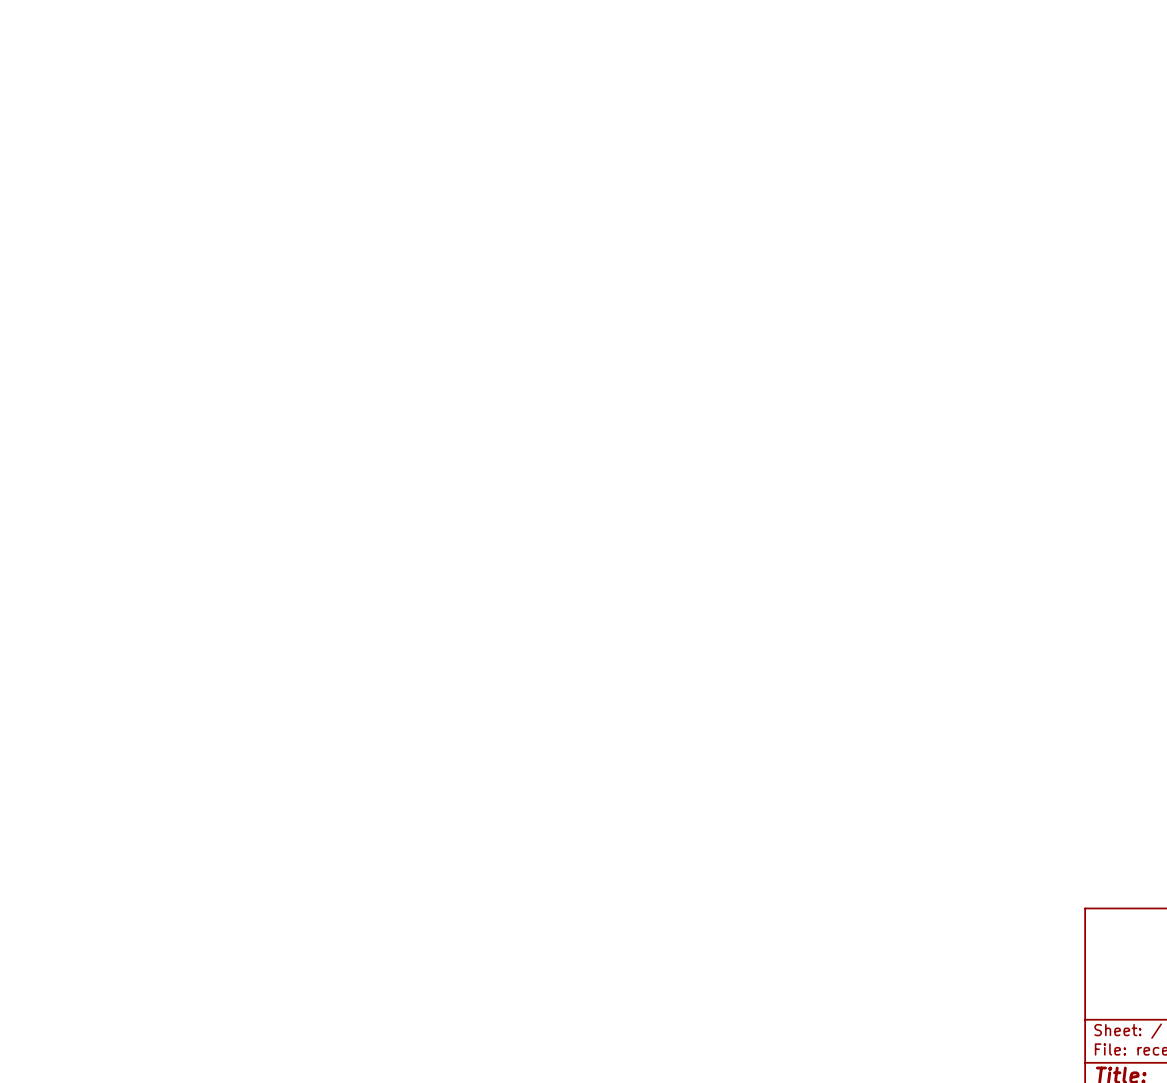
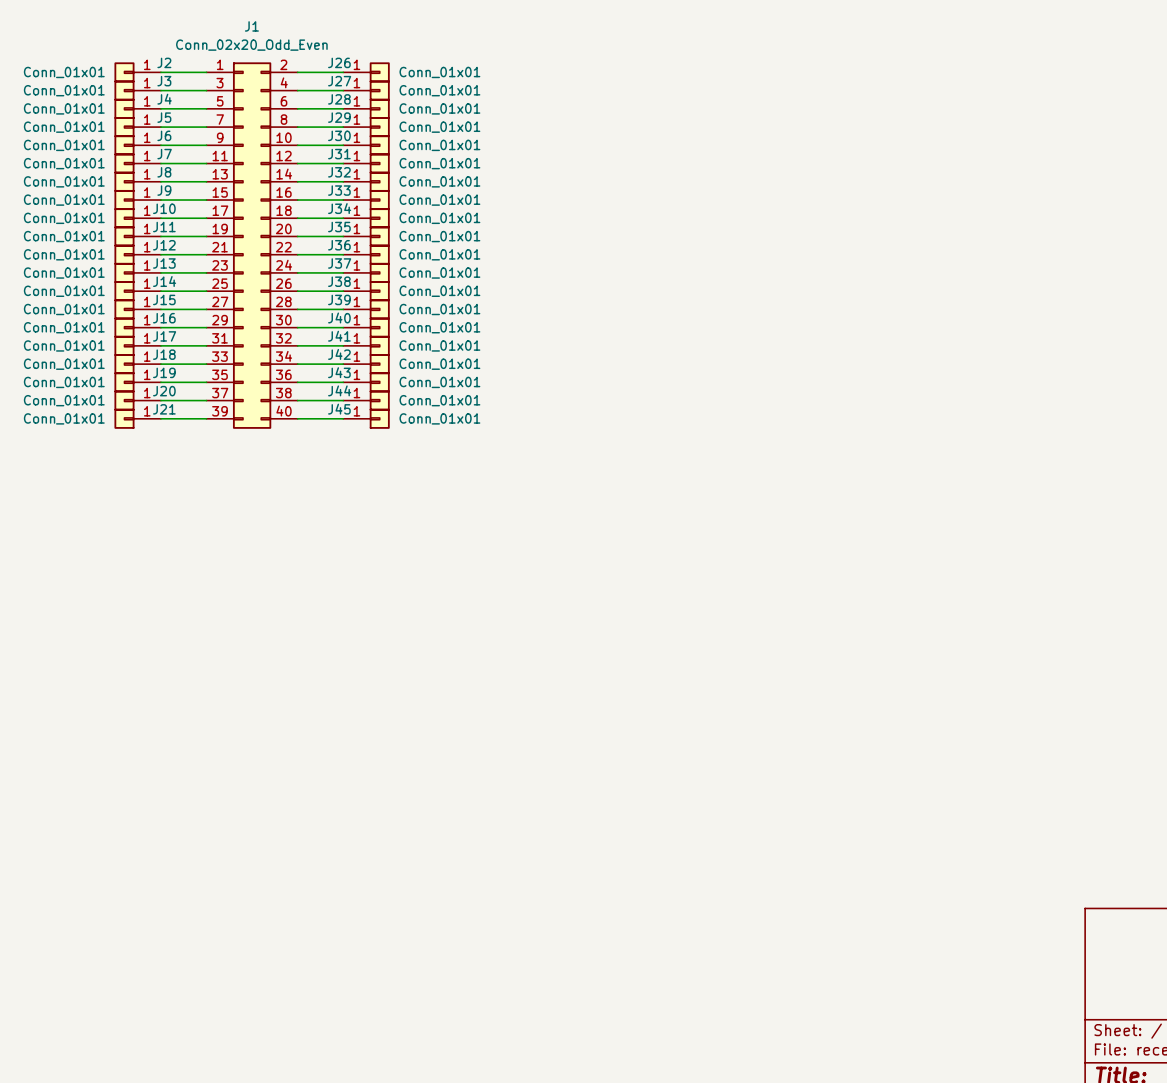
J2: none -> Conn_01x01 (137, 72)
wire: none -> (160, 72) (206, 72)
wire: none -> (297, 72) (343, 72)
J26: none -> Conn_01x01 (366, 72)
J3: none -> Conn_01x01 (137, 90)
wire: none -> (160, 90) (206, 90)
wire: none -> (297, 90) (343, 90)
J27: none -> Conn_01x01 (366, 90)
J4: none -> Conn_01x01 (137, 108)
wire: none -> (160, 108) (206, 108)
wire: none -> (297, 108) (343, 108)
J28: none -> Conn_01x01 (366, 108)
J5: none -> Conn_01x01 (137, 127)
wire: none -> (160, 127) (206, 127)
wire: none -> (297, 127) (343, 127)
J29: none -> Conn_01x01 (366, 127)
J6: none -> Conn_01x01 (137, 145)
wire: none -> (160, 145) (206, 145)
wire: none -> (297, 145) (343, 145)
J30: none -> Conn_01x01 (366, 145)
J7: none -> Conn_01x01 (137, 163)
wire: none -> (160, 163) (206, 163)
wire: none -> (297, 163) (343, 163)
J31: none -> Conn_01x01 (366, 163)
J8: none -> Conn_01x01 (137, 181)
wire: none -> (160, 181) (206, 181)
wire: none -> (297, 181) (343, 181)
J32: none -> Conn_01x01 (366, 181)
J9: none -> Conn_01x01 (137, 200)
wire: none -> (160, 200) (206, 200)
wire: none -> (297, 200) (343, 200)
J33: none -> Conn_01x01 (366, 200)
J10: none -> Conn_01x01 (137, 218)
wire: none -> (160, 218) (206, 218)
wire: none -> (297, 218) (343, 218)
J34: none -> Conn_01x01 (366, 218)
J11: none -> Conn_01x01 (137, 236)
wire: none -> (160, 236) (206, 236)
wire: none -> (297, 236) (343, 236)
J35: none -> Conn_01x01 (366, 236)
J1: none -> Conn_02x20_Odd_Even (252, 245)
J12: none -> Conn_01x01 (137, 254)
wire: none -> (160, 254) (206, 254)
wire: none -> (297, 254) (343, 254)
J36: none -> Conn_01x01 (366, 254)
J13: none -> Conn_01x01 (137, 272)
wire: none -> (160, 272) (206, 272)
wire: none -> (297, 272) (343, 272)
J37: none -> Conn_01x01 (366, 272)
J14: none -> Conn_01x01 (137, 291)
wire: none -> (160, 291) (206, 291)
wire: none -> (297, 291) (343, 291)
J38: none -> Conn_01x01 (366, 291)
J15: none -> Conn_01x01 (137, 309)
wire: none -> (160, 309) (206, 309)
wire: none -> (297, 309) (343, 309)
J39: none -> Conn_01x01 (366, 309)
J16: none -> Conn_01x01 (137, 327)
wire: none -> (160, 327) (206, 327)
wire: none -> (297, 327) (343, 327)
J40: none -> Conn_01x01 (366, 327)
J17: none -> Conn_01x01 (137, 345)
wire: none -> (160, 345) (206, 345)
wire: none -> (297, 345) (343, 345)
J41: none -> Conn_01x01 (366, 345)
J18: none -> Conn_01x01 (137, 364)
wire: none -> (160, 364) (206, 364)
wire: none -> (297, 364) (343, 364)
J42: none -> Conn_01x01 (366, 364)
J19: none -> Conn_01x01 (137, 382)
wire: none -> (160, 382) (206, 382)
wire: none -> (297, 382) (343, 382)
J43: none -> Conn_01x01 (366, 382)
J20: none -> Conn_01x01 (137, 400)
wire: none -> (160, 400) (206, 400)
wire: none -> (297, 400) (343, 400)
J44: none -> Conn_01x01 (366, 400)
J21: none -> Conn_01x01 (137, 418)
wire: none -> (160, 418) (206, 418)
wire: none -> (297, 418) (343, 418)
J45: none -> Conn_01x01 (366, 418)

